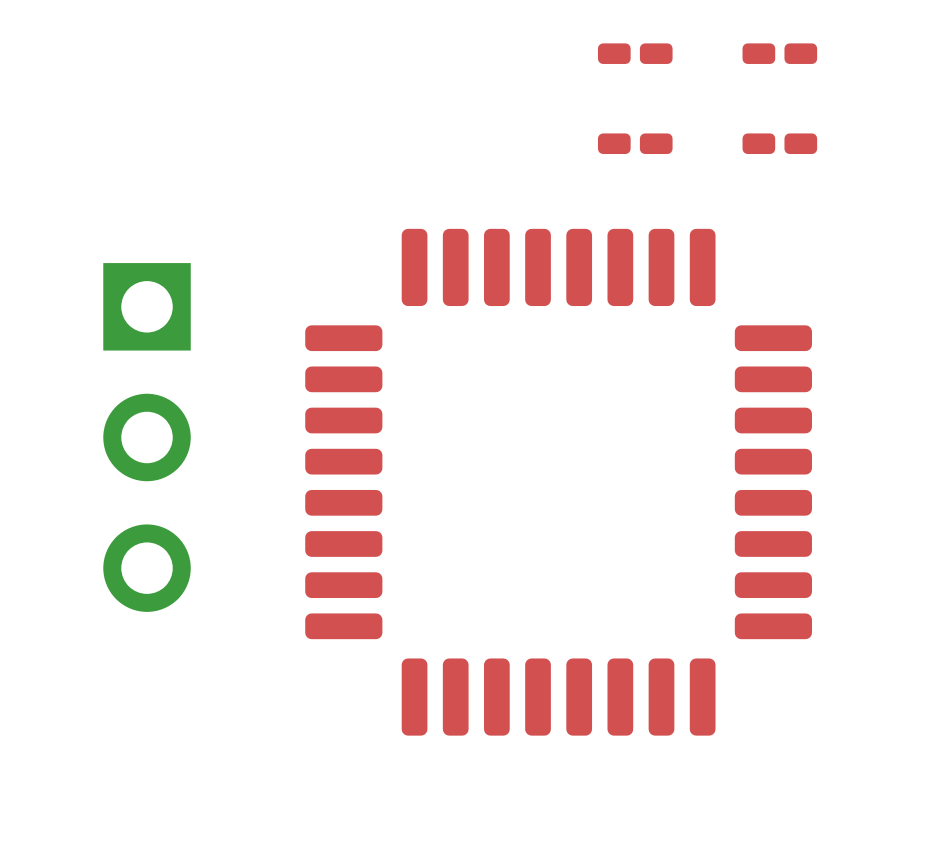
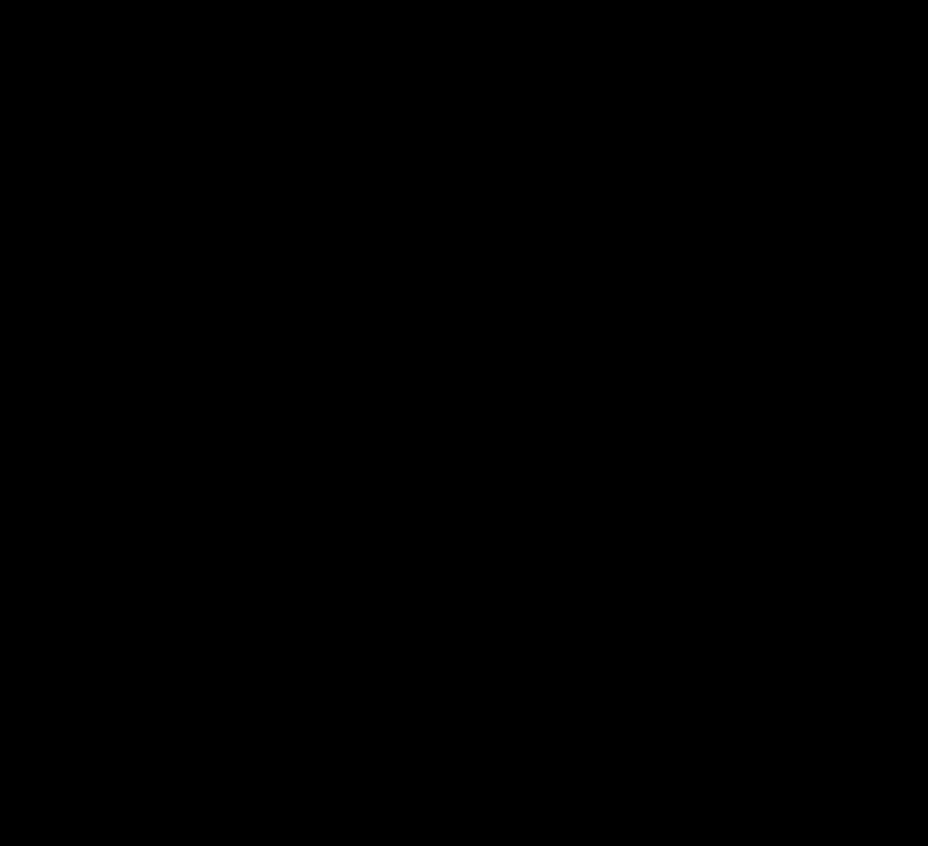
part: (635, 53) -> none
part: (779, 53) -> none
part: (635, 143) -> none
part: (779, 143) -> none
part: (147, 437) -> none
part: (558, 482) -> none

